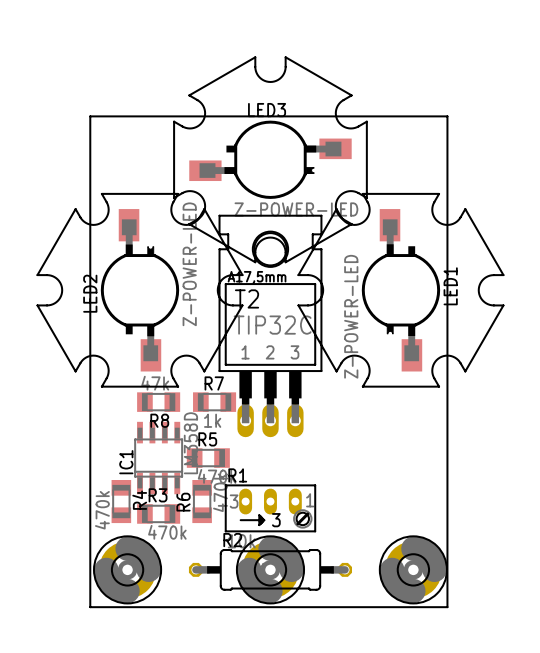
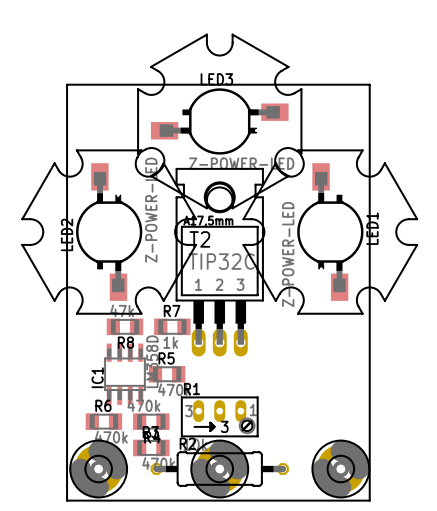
R4 rotation: 0° (121, 501) -> 90° clockwise (151, 421)
R4 position: (121, 501) -> (151, 421)
R6 rotation: 0° (202, 501) -> 90° clockwise (103, 421)
R6 position: (202, 501) -> (103, 421)
R3 position: (158, 513) -> (151, 447)

